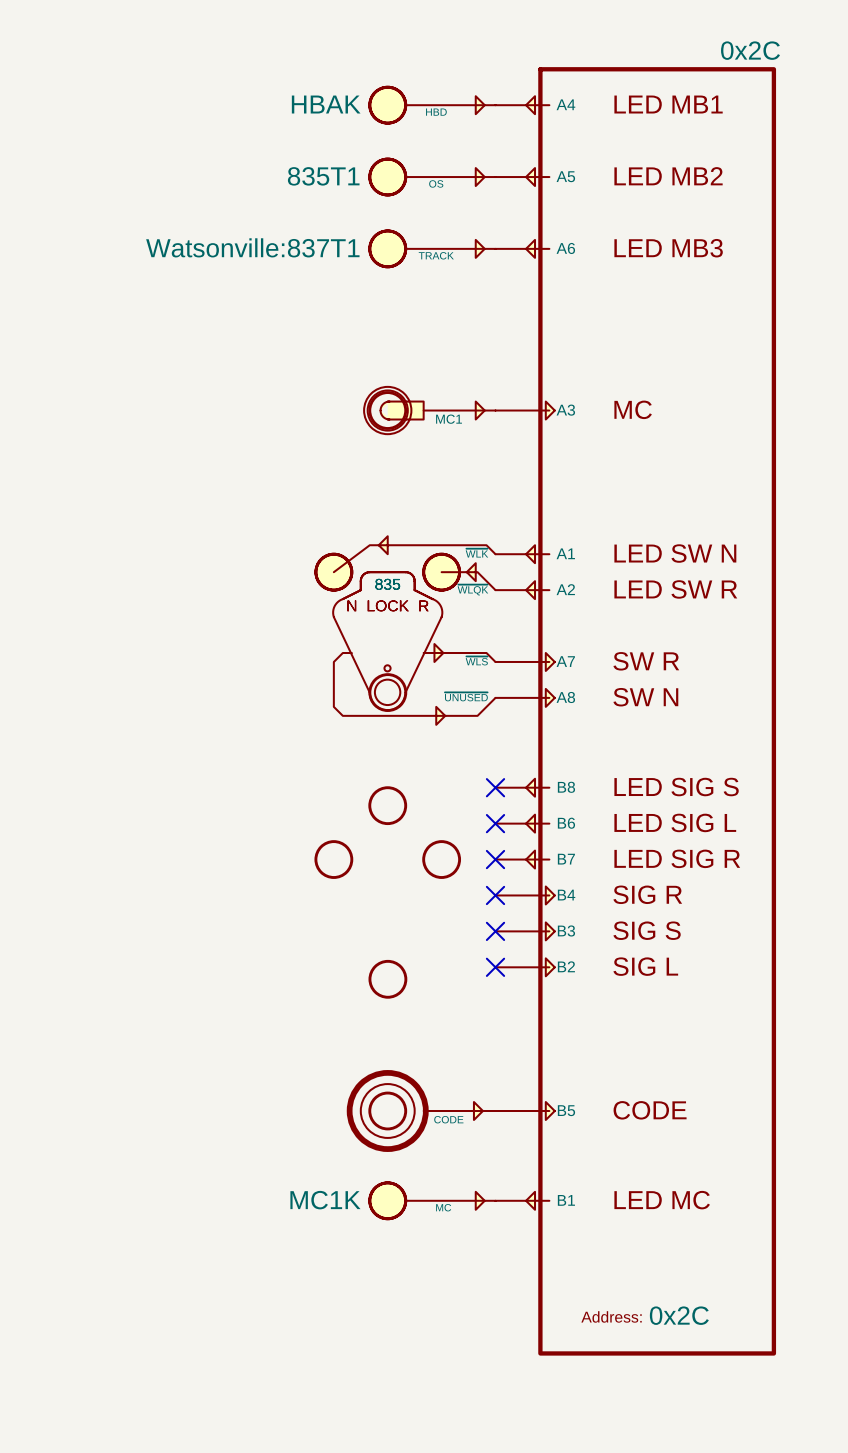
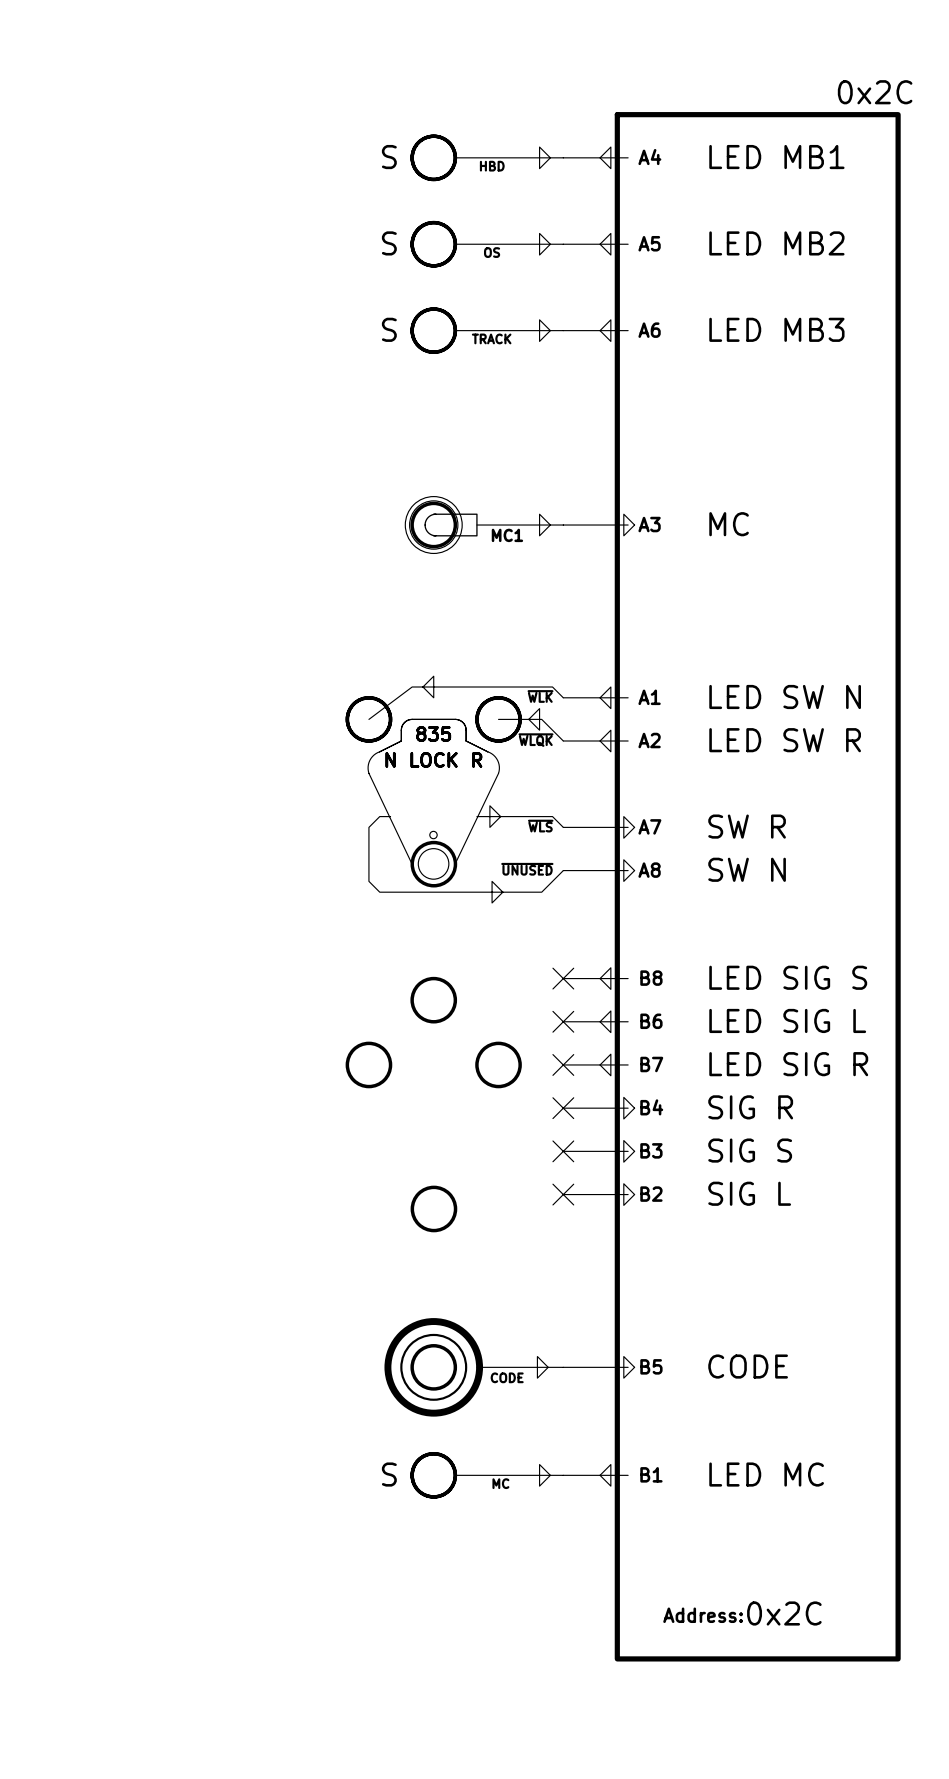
part text: HBAK (326, 104) -> S (389, 157)
part text: 835T1 (323, 176) -> S (389, 243)
part text: Watsonville:837T1 (252, 247) -> S (389, 329)
part text: MC1K (325, 1200) -> S (389, 1474)

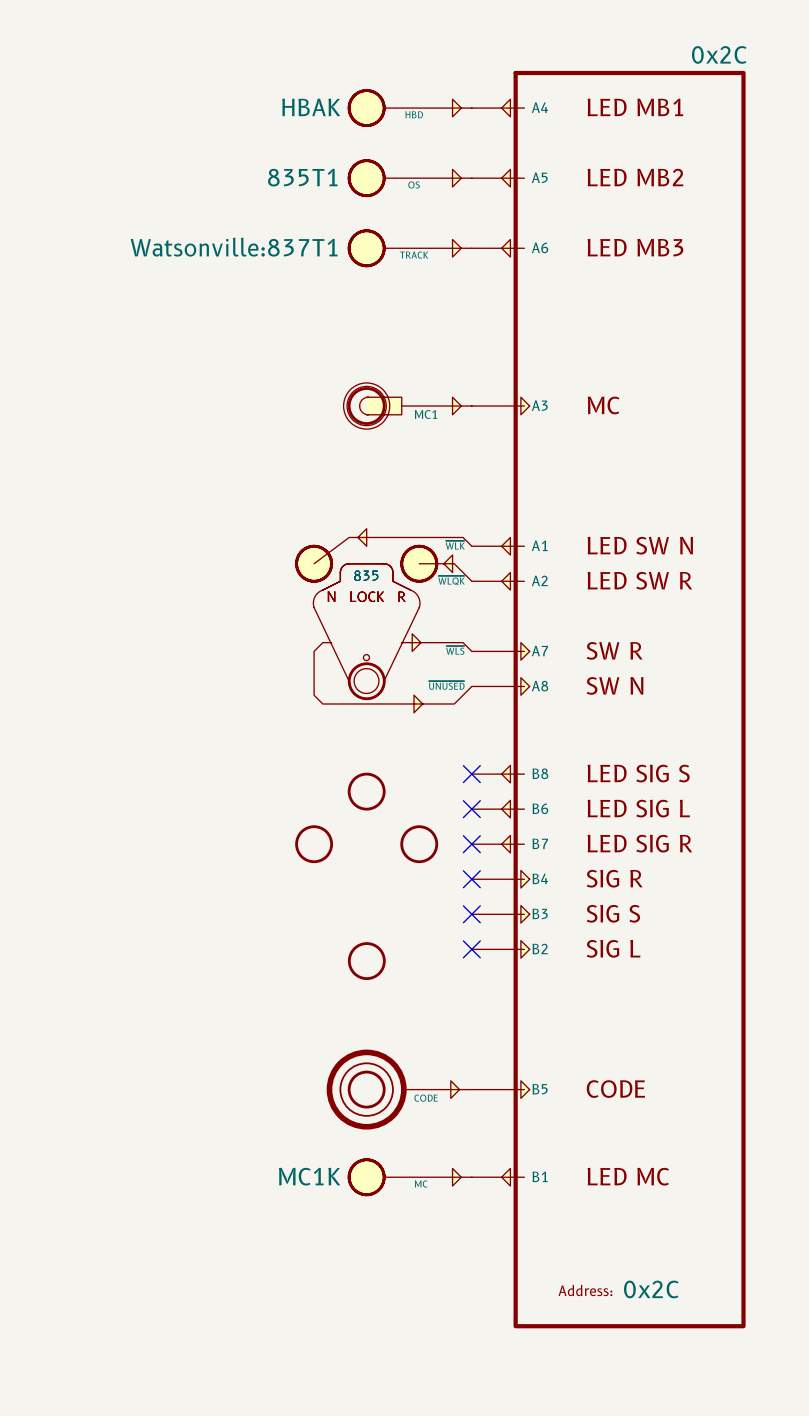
part text: S (389, 157) -> HBAK (311, 107)
part text: S (389, 243) -> 835T1 (302, 177)
part text: S (389, 329) -> Watsonville:837T1 (234, 247)
part text: S (389, 1474) -> MC1K (309, 1176)

